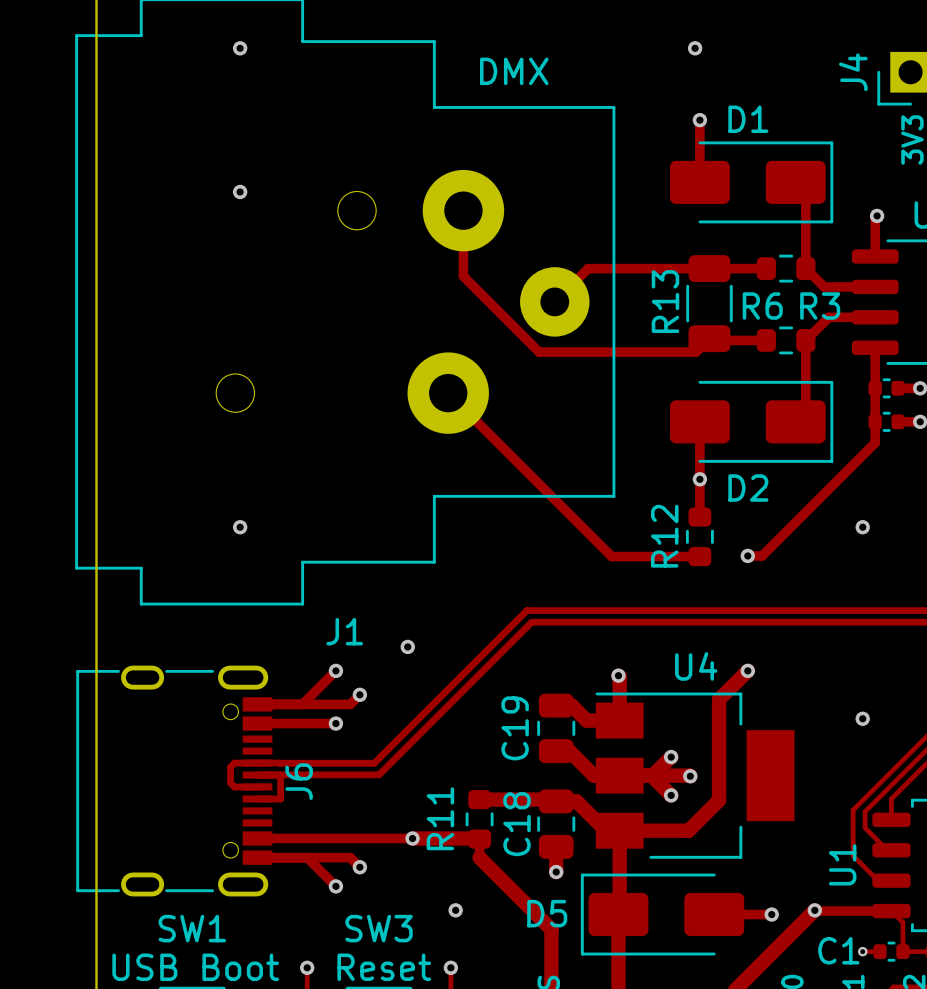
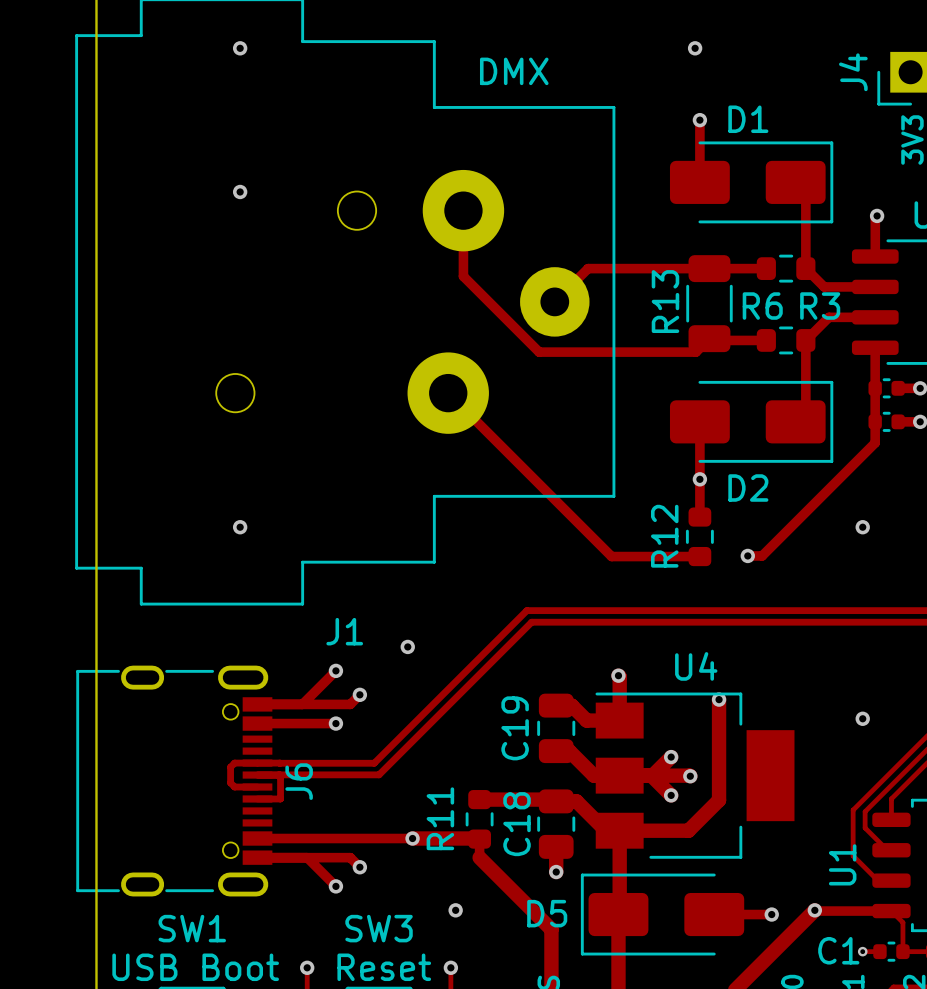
top track: (747, 670) (719, 699) -> none
via position: (747, 670) -> (719, 699)

